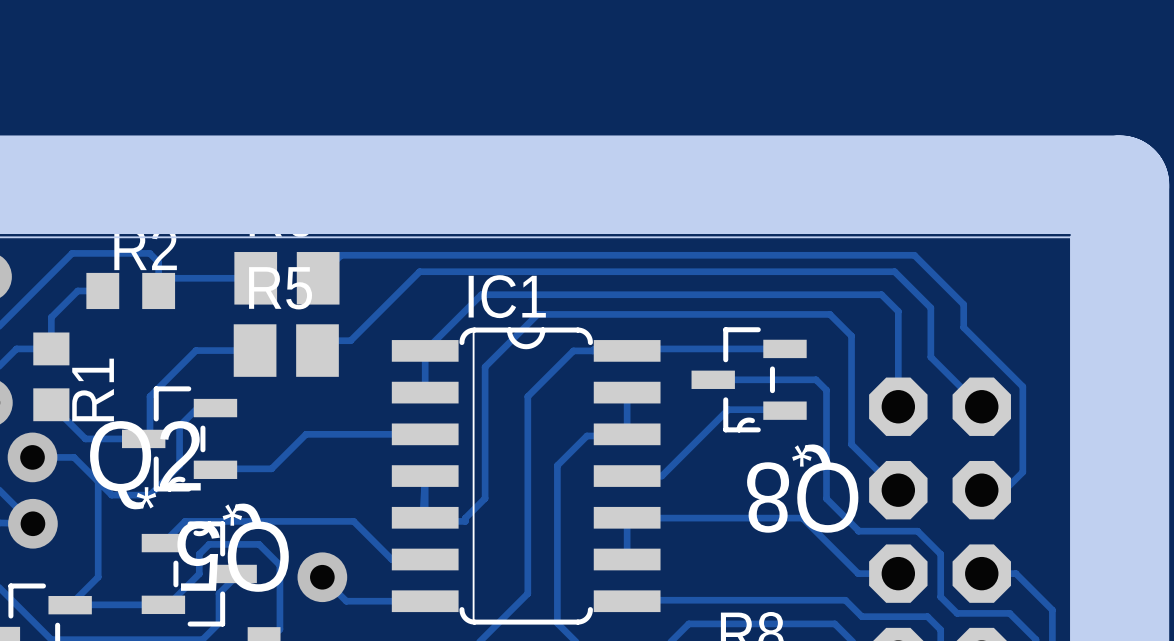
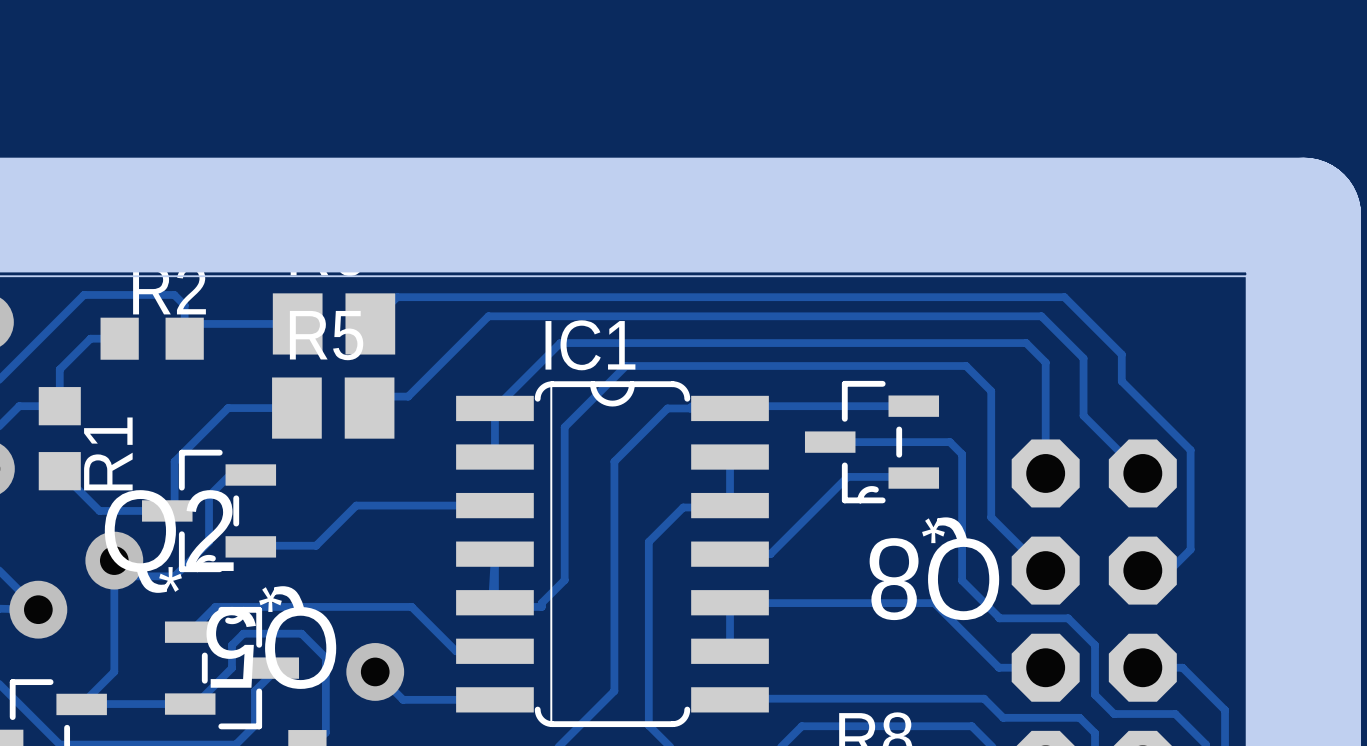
track: (32, 457) (74, 457) (98, 481) -> none
via position: (32, 457) -> (114, 560)

